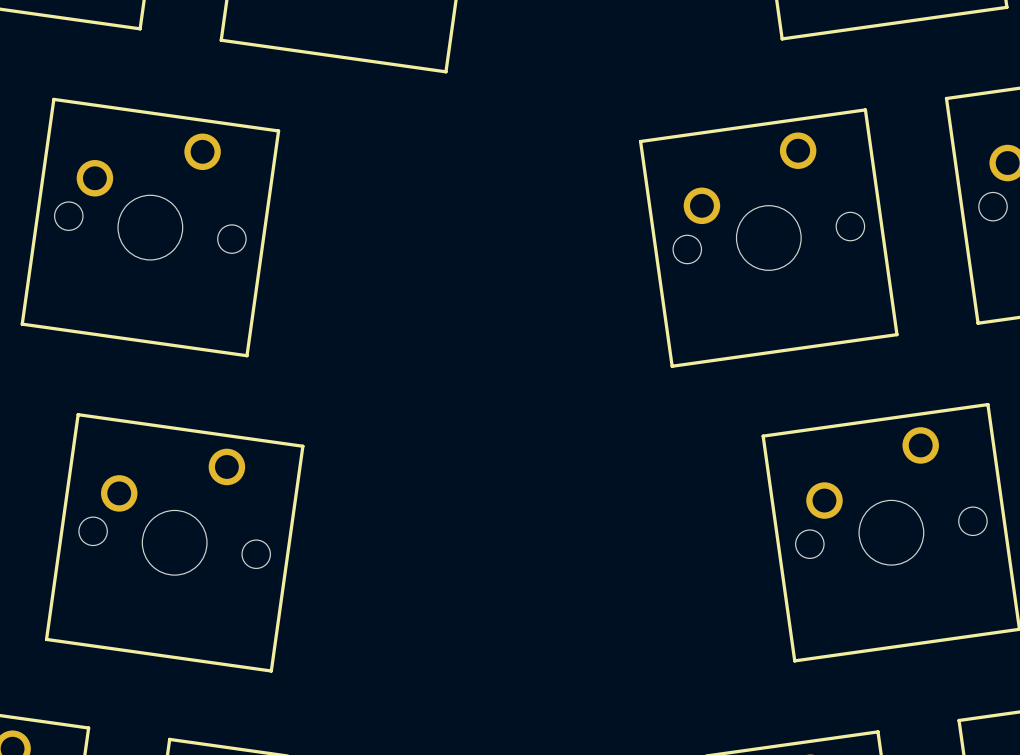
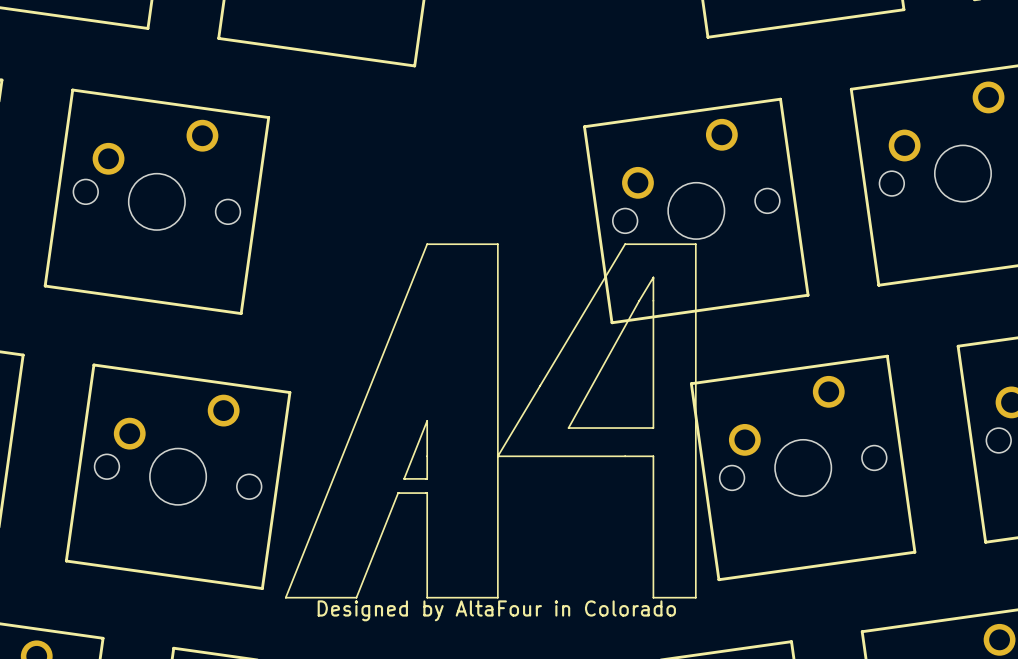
line: none -> (427, 244) (497, 244) (497, 597) (427, 597) (427, 493) (398, 493) (356, 597) (285, 597) (427, 244)
line: none -> (625, 244) (497, 456) (653, 456) (653, 597) (695, 597) (695, 244) (625, 244)
line: none -> (653, 277) (653, 428) (568, 428) (639, 300) (653, 277)
line: none -> (427, 420) (404, 478) (427, 478) (427, 420)
text: none -> Designed by AltaFour in Colorado (496, 610)

